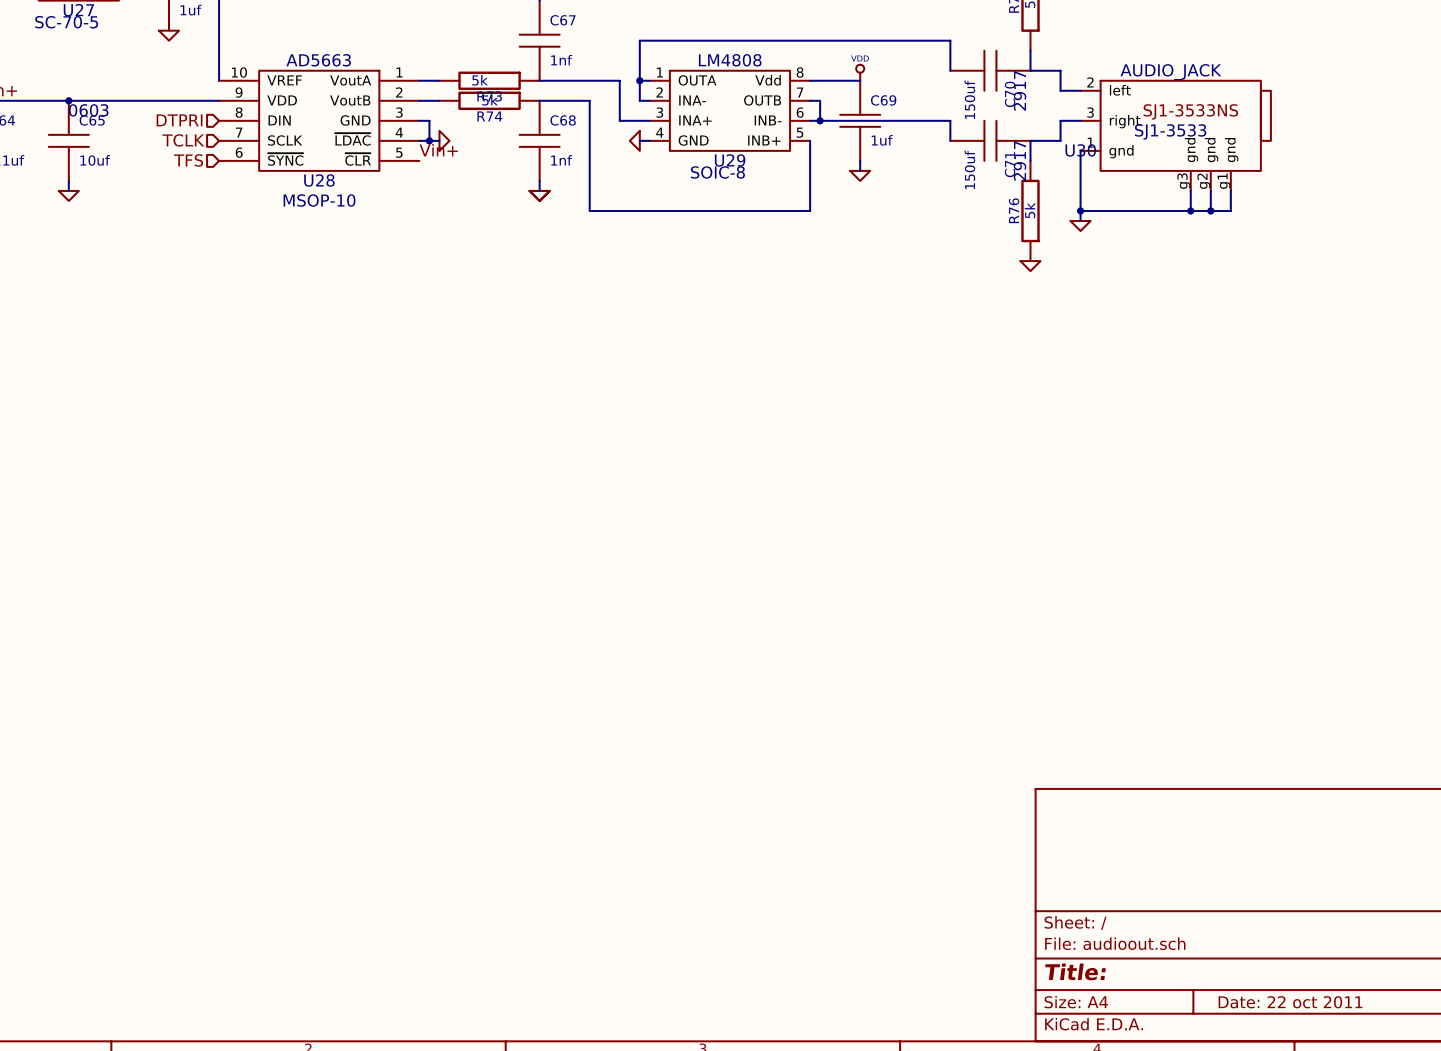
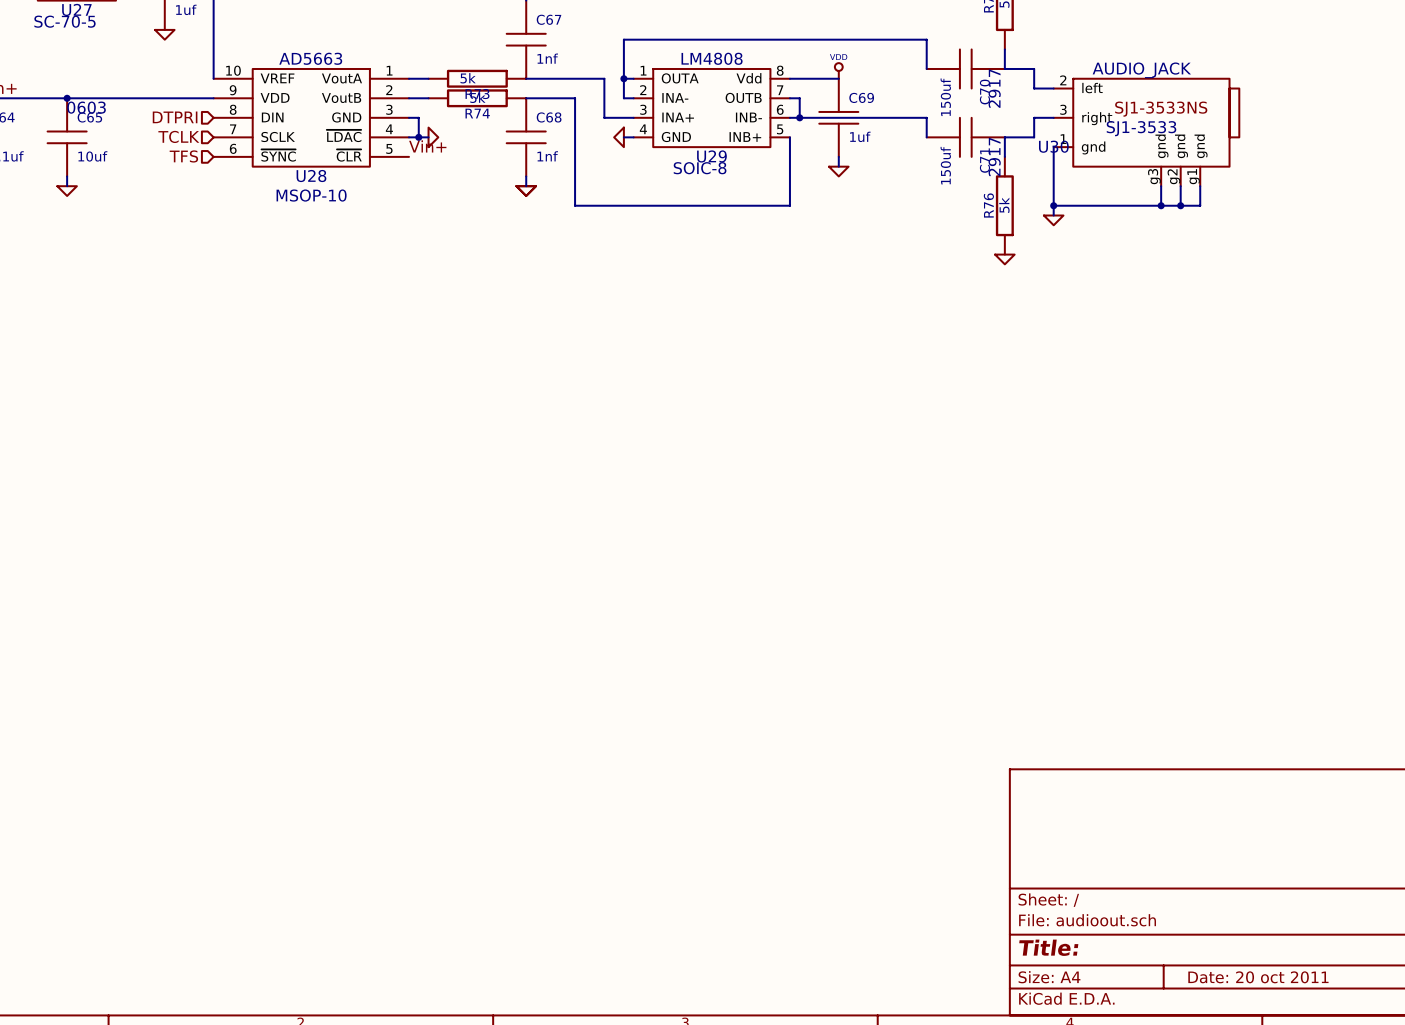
title block: Date: 22 oct 2011 (1290, 1002) -> Date: 20 oct 2011 (1258, 977)

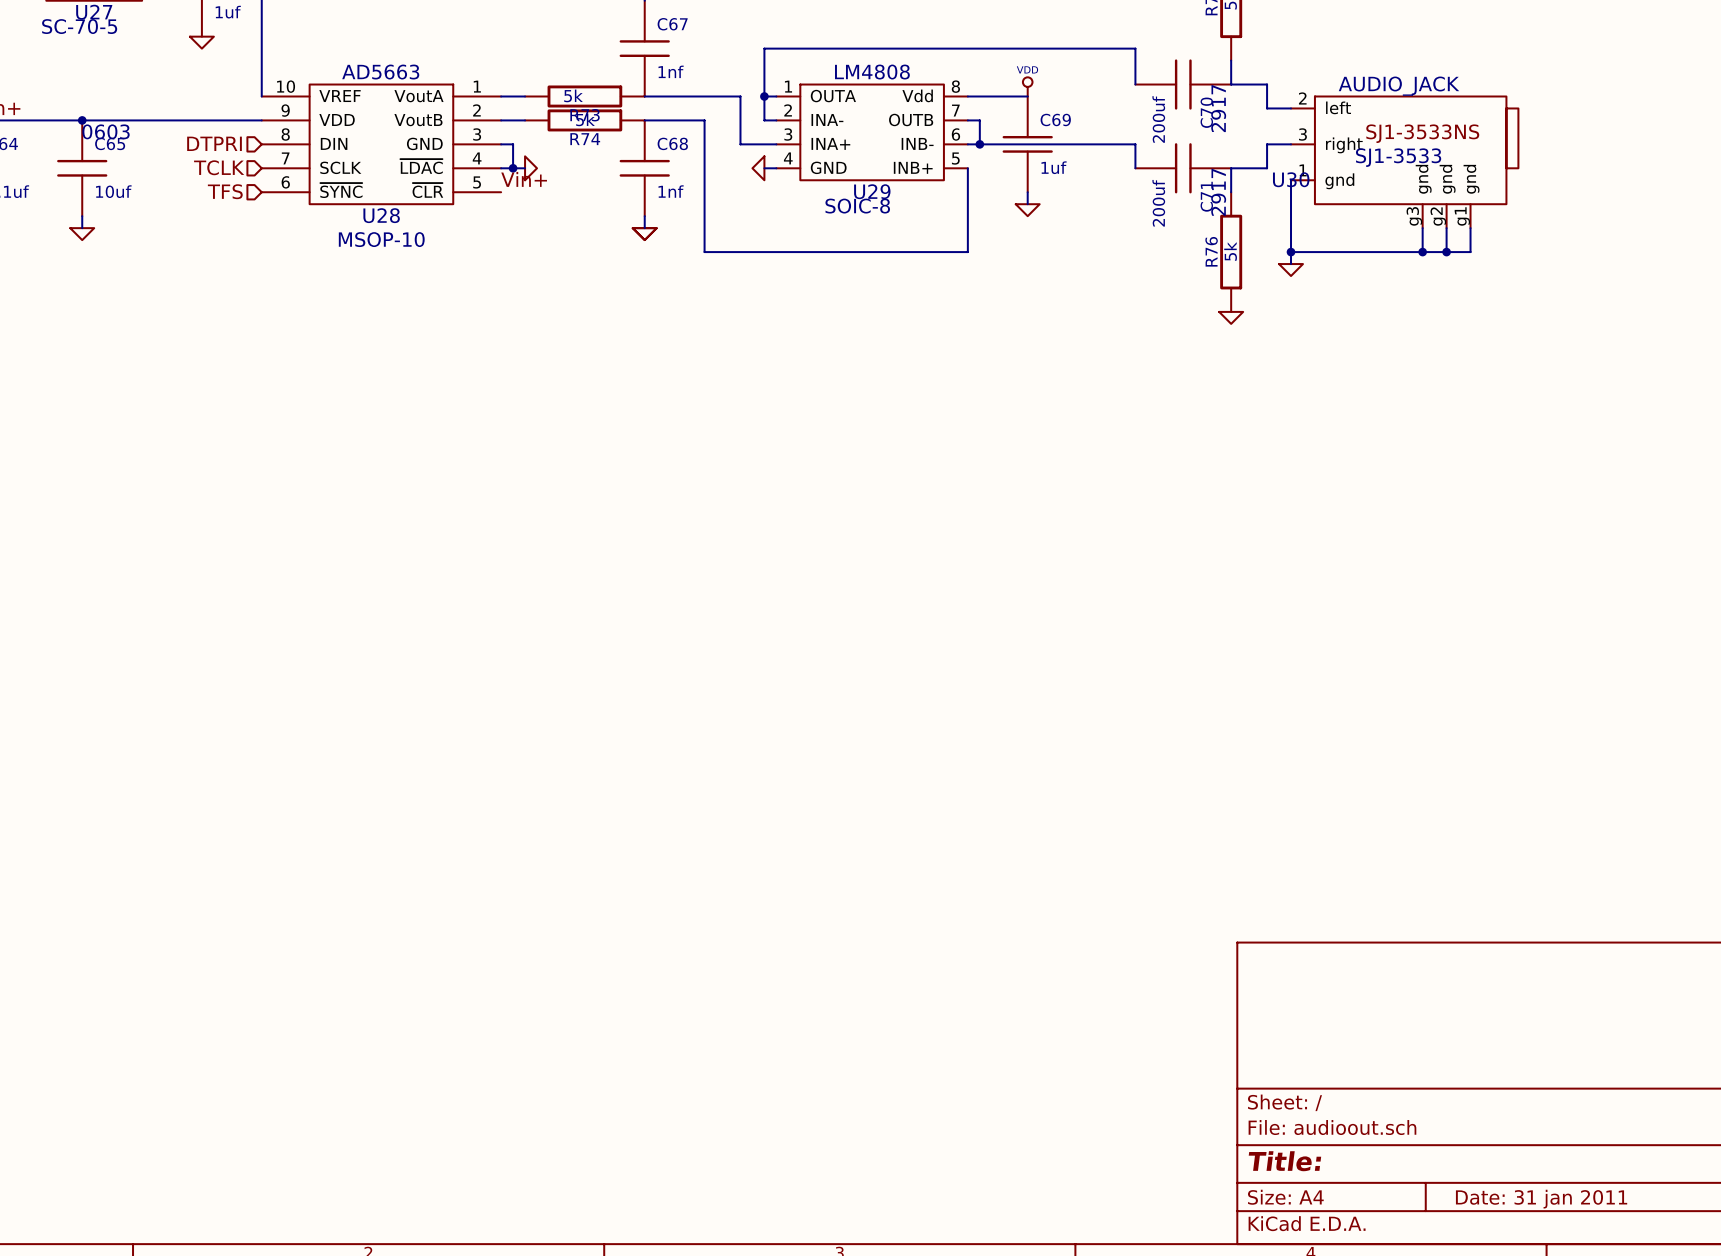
C70 value: 150uf (945, 97) -> 200uf (1158, 119)
C71 value: 150uf (945, 165) -> 200uf (1158, 203)
title block: Date: 20 oct 2011 (1258, 977) -> Date: 31 jan 2011 (1541, 1199)

